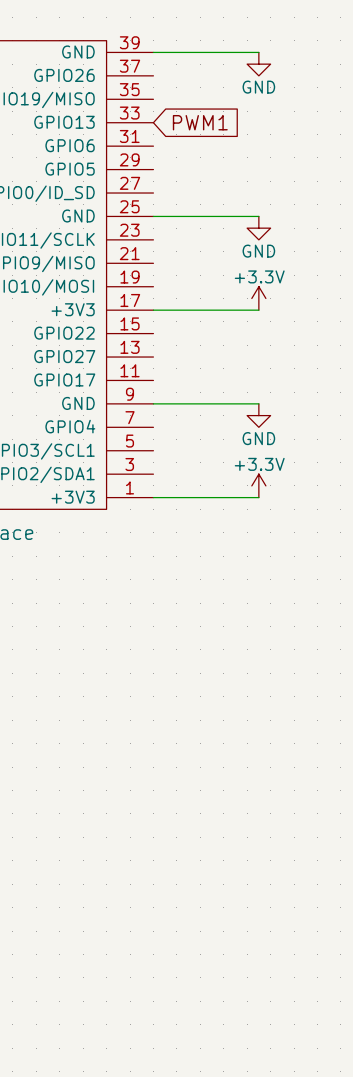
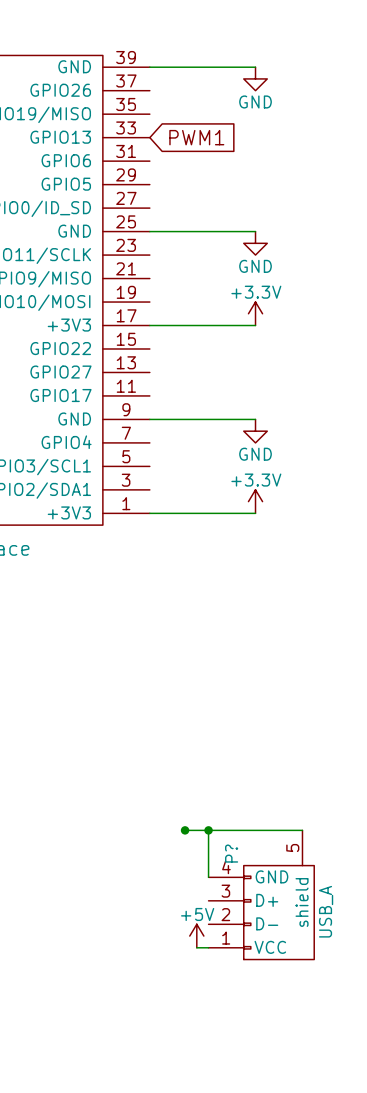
wire: none -> (185, 830) (302, 830)
junction: none -> (185, 830)
wire: none -> (208, 830) (208, 877)
junction: none -> (208, 830)
P?: none -> USB_A (261, 894)
power symbol: none -> +5V (196, 936)
wire: none -> (196, 947) (208, 947)

